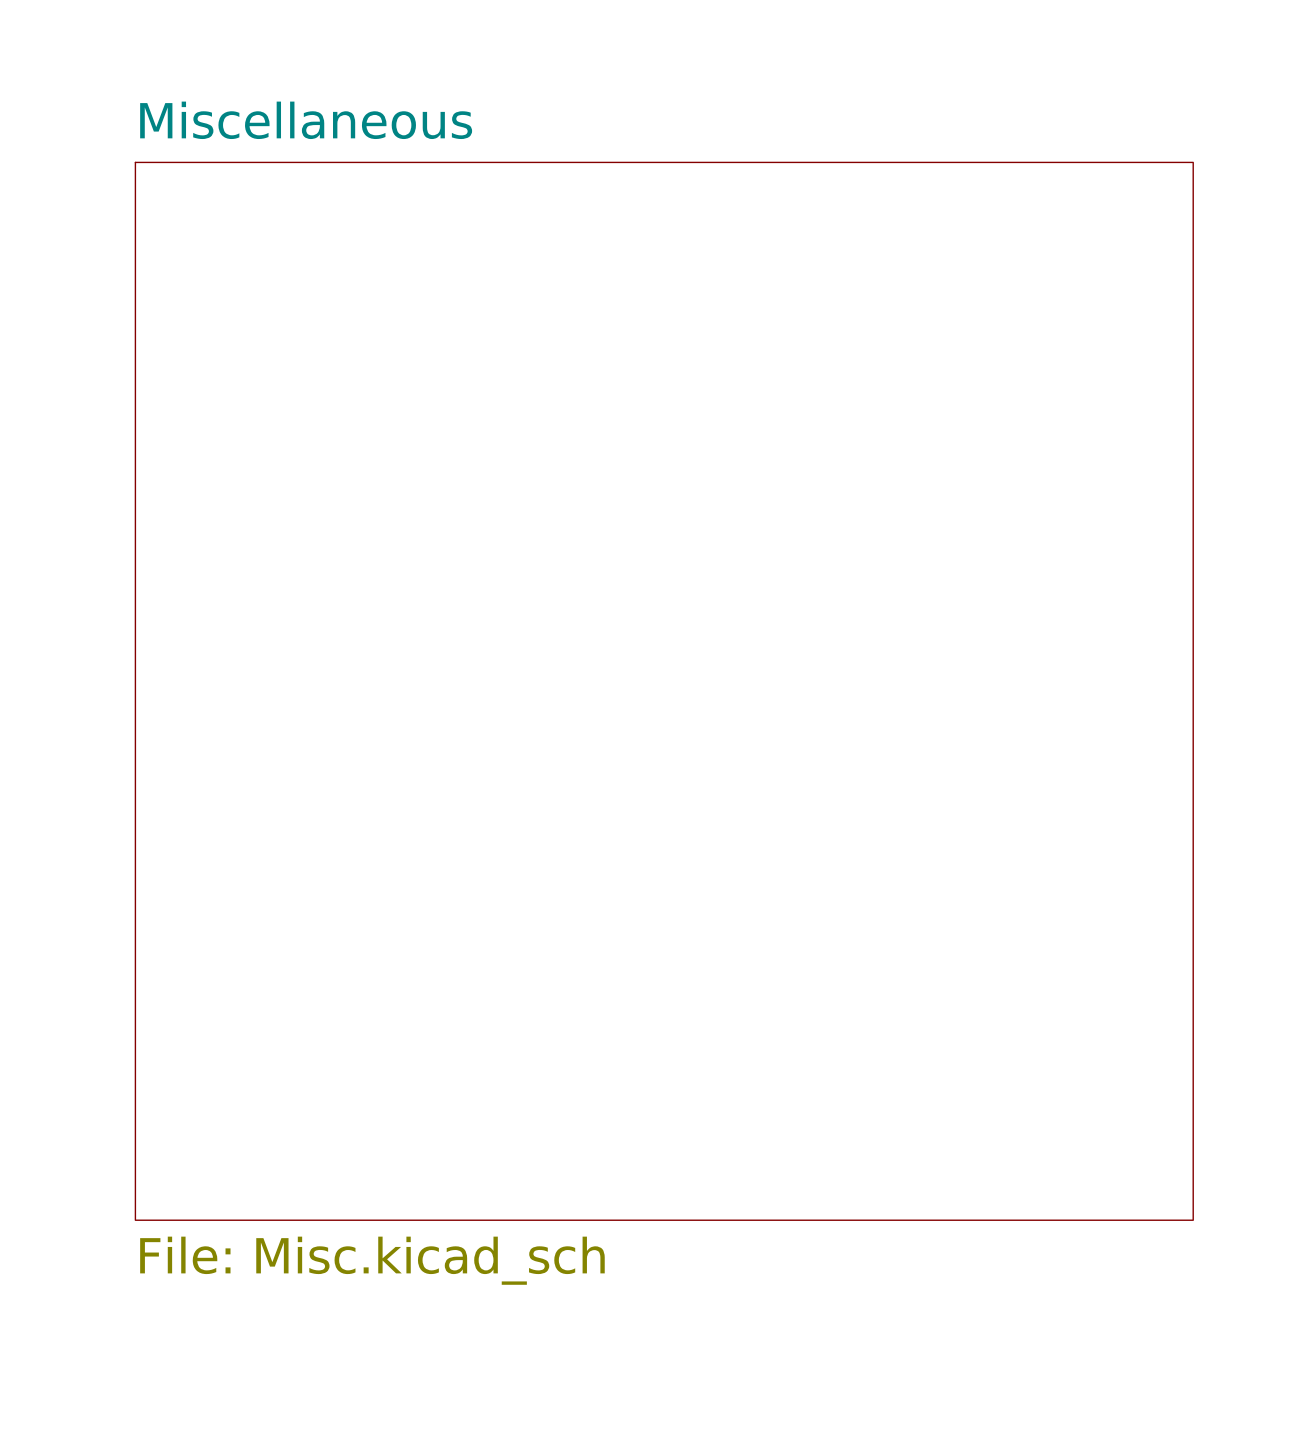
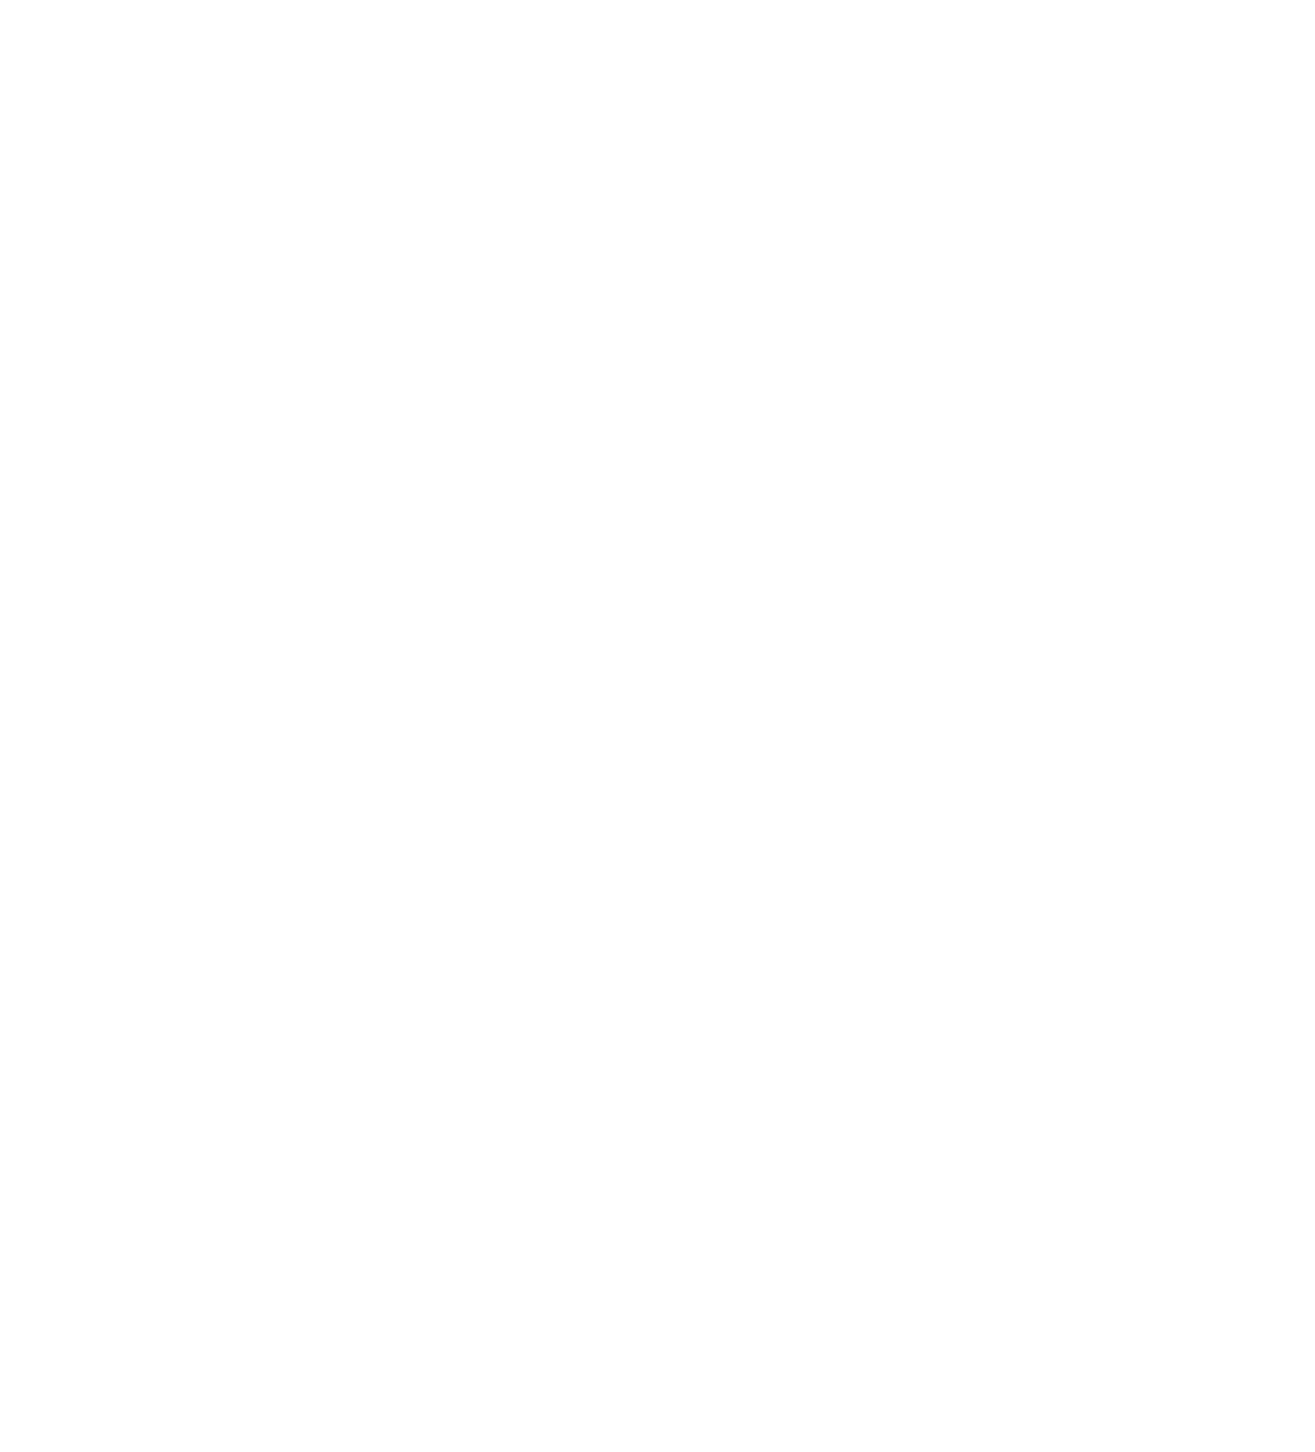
sheet Miscellaneous: File: Misc.kicad_sch (664, 691) -> none

